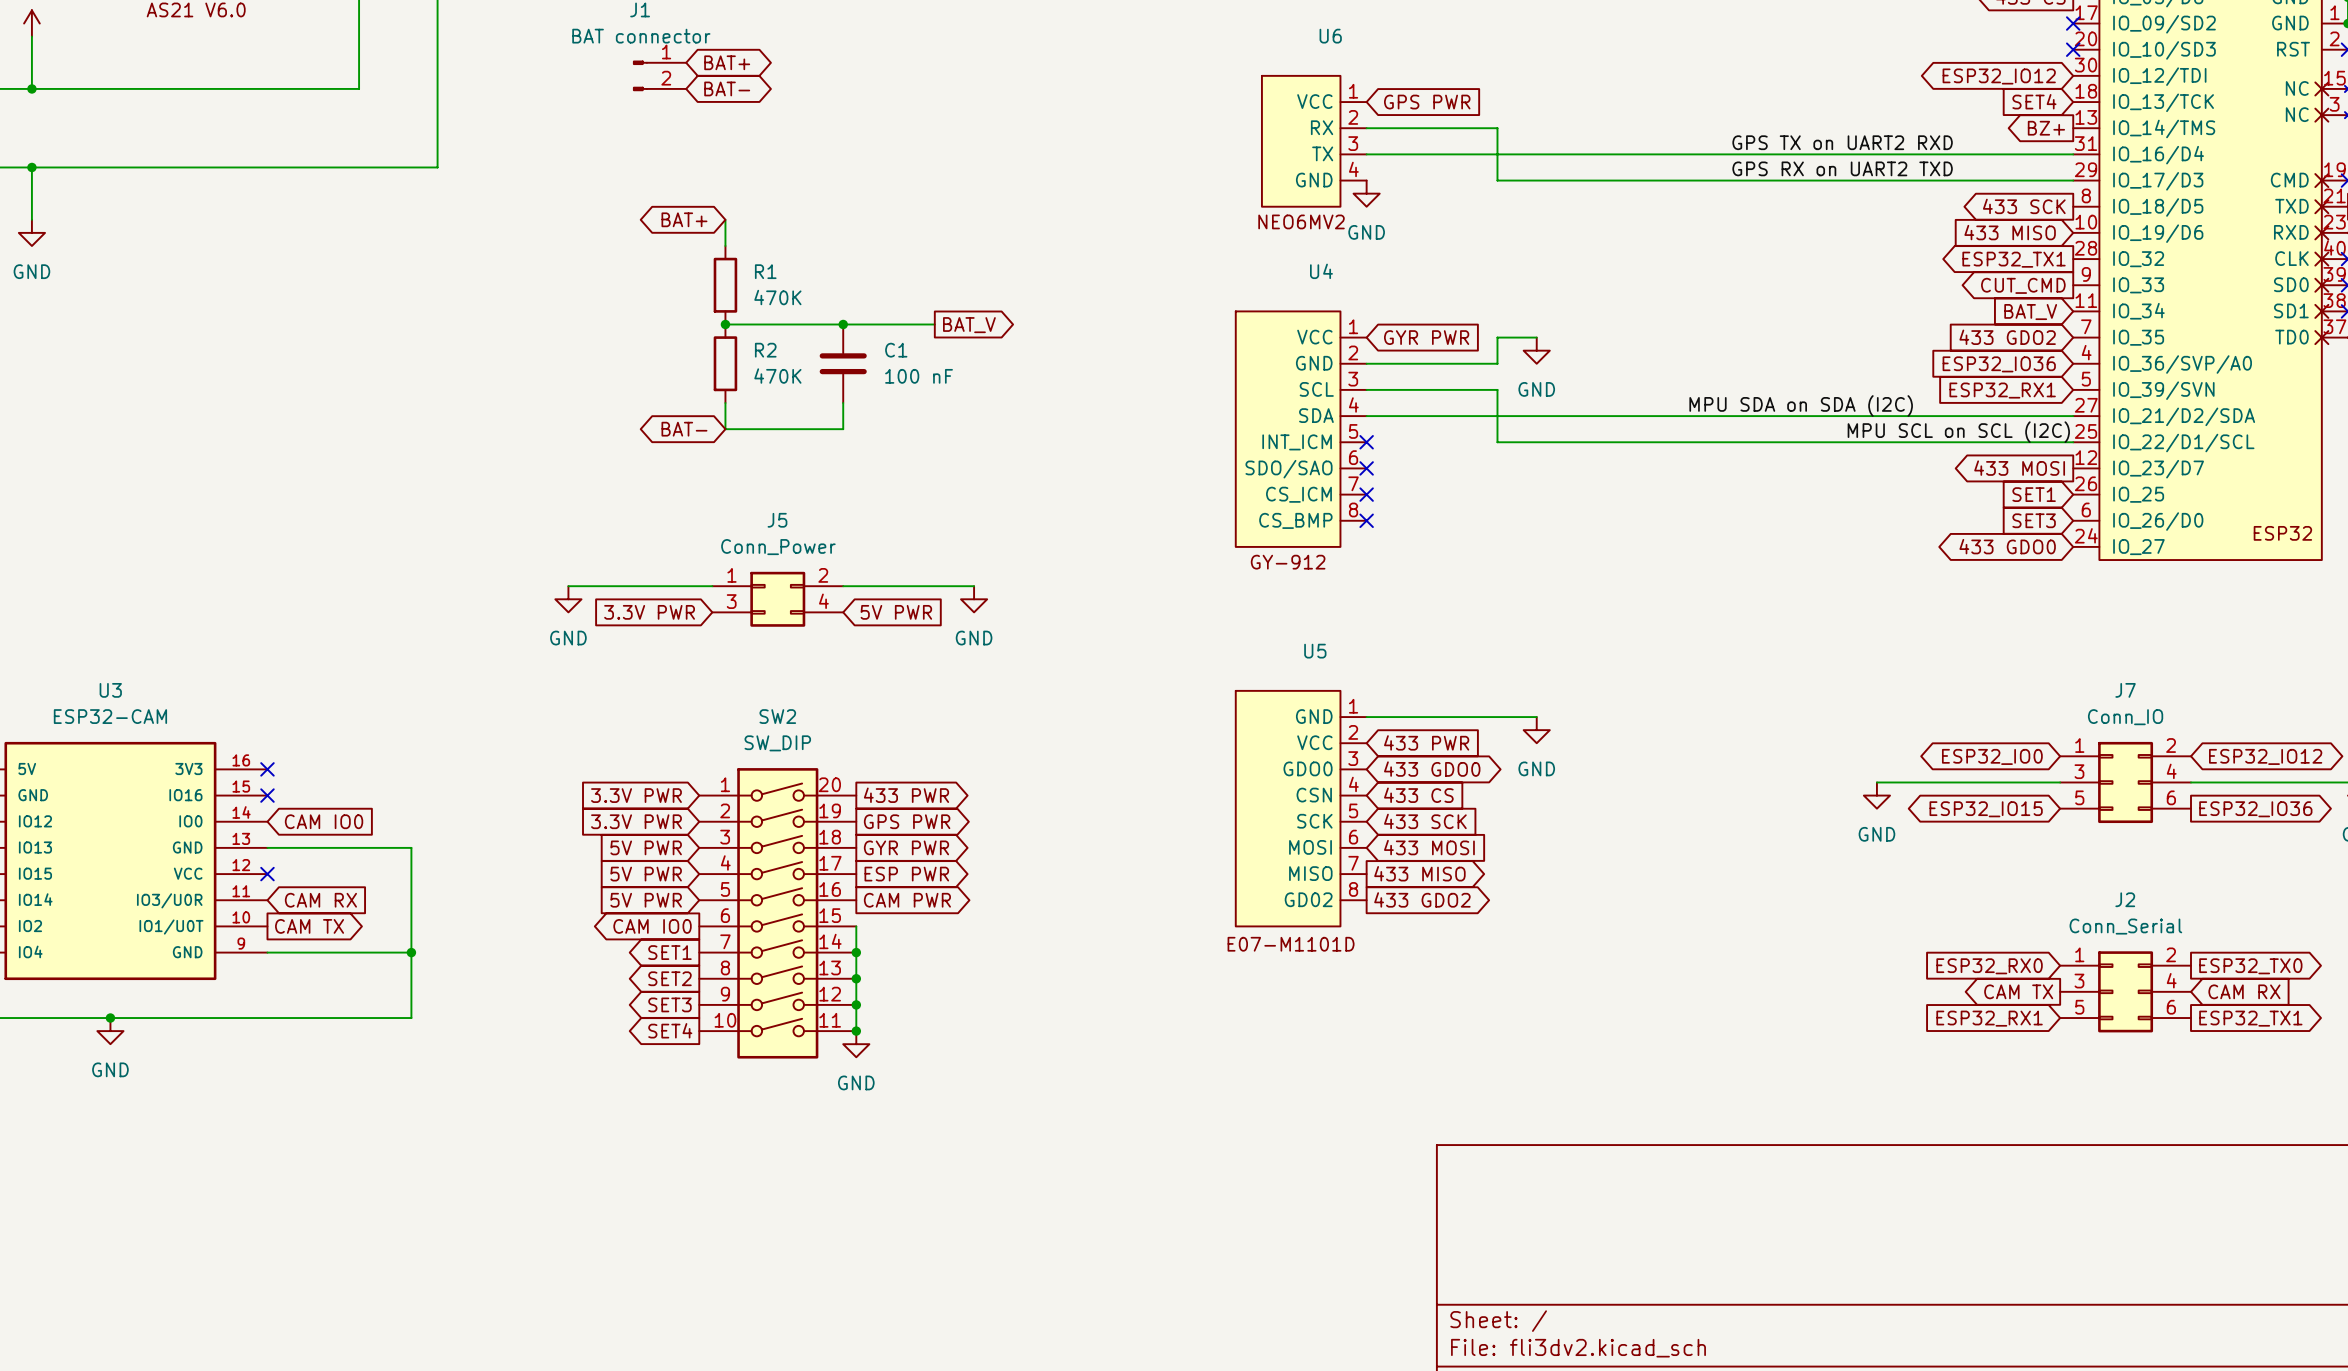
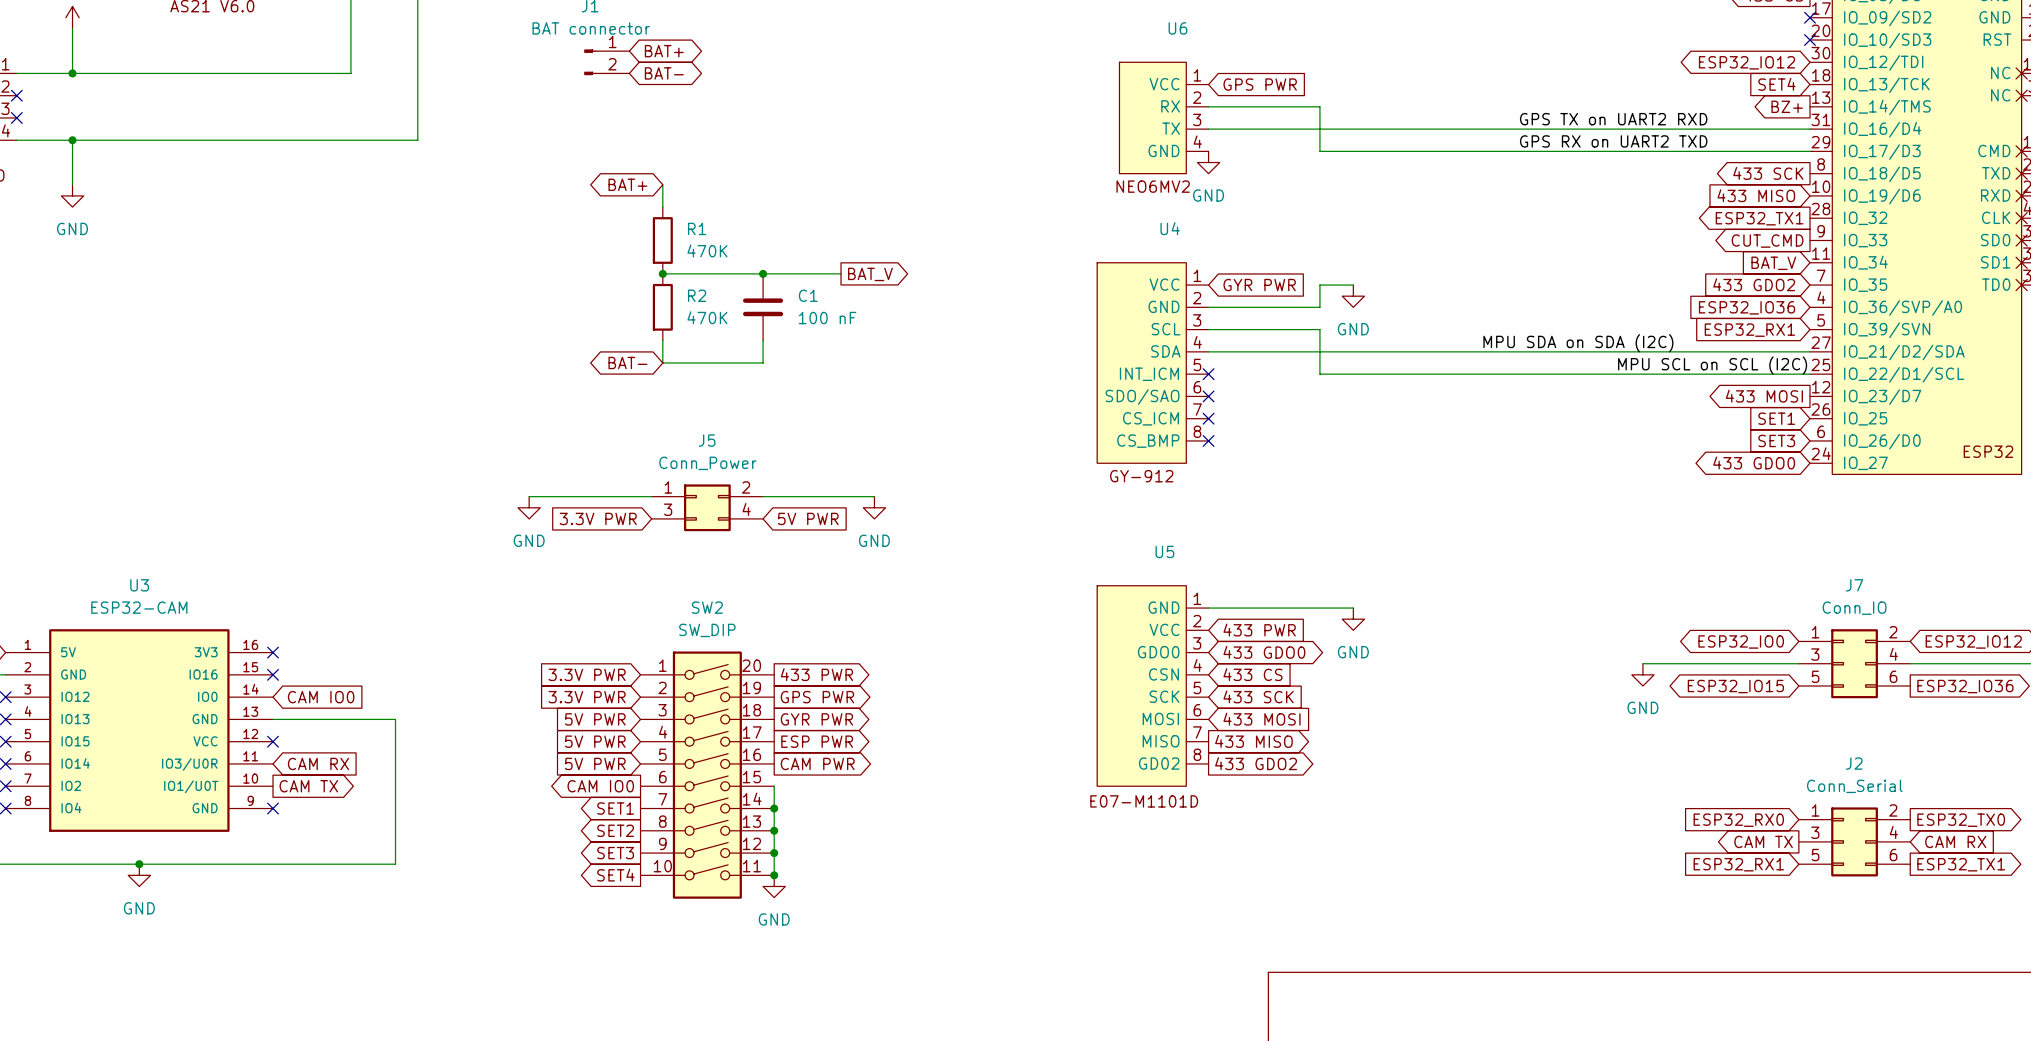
wire: (267, 952) (411, 952) -> none
no-connect mark: none -> (273, 808)
junction: (411, 952) -> none

